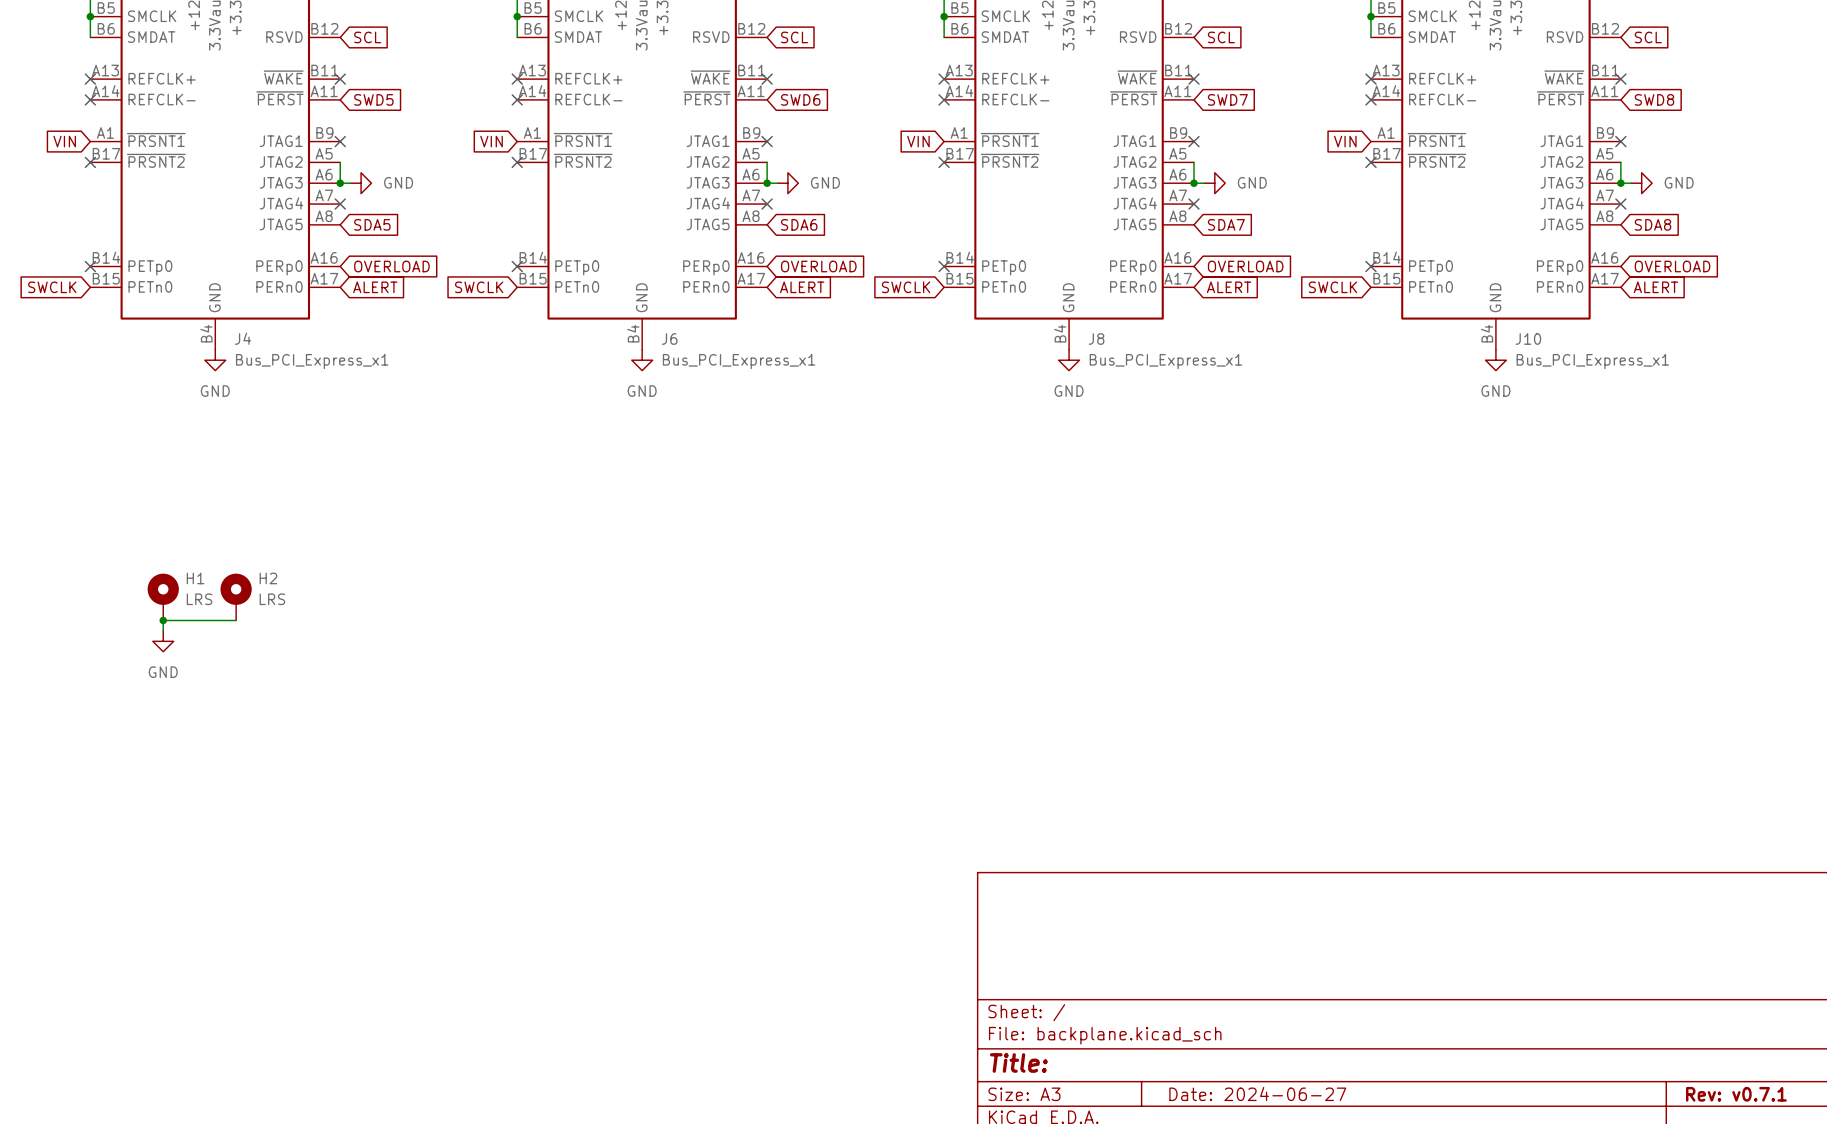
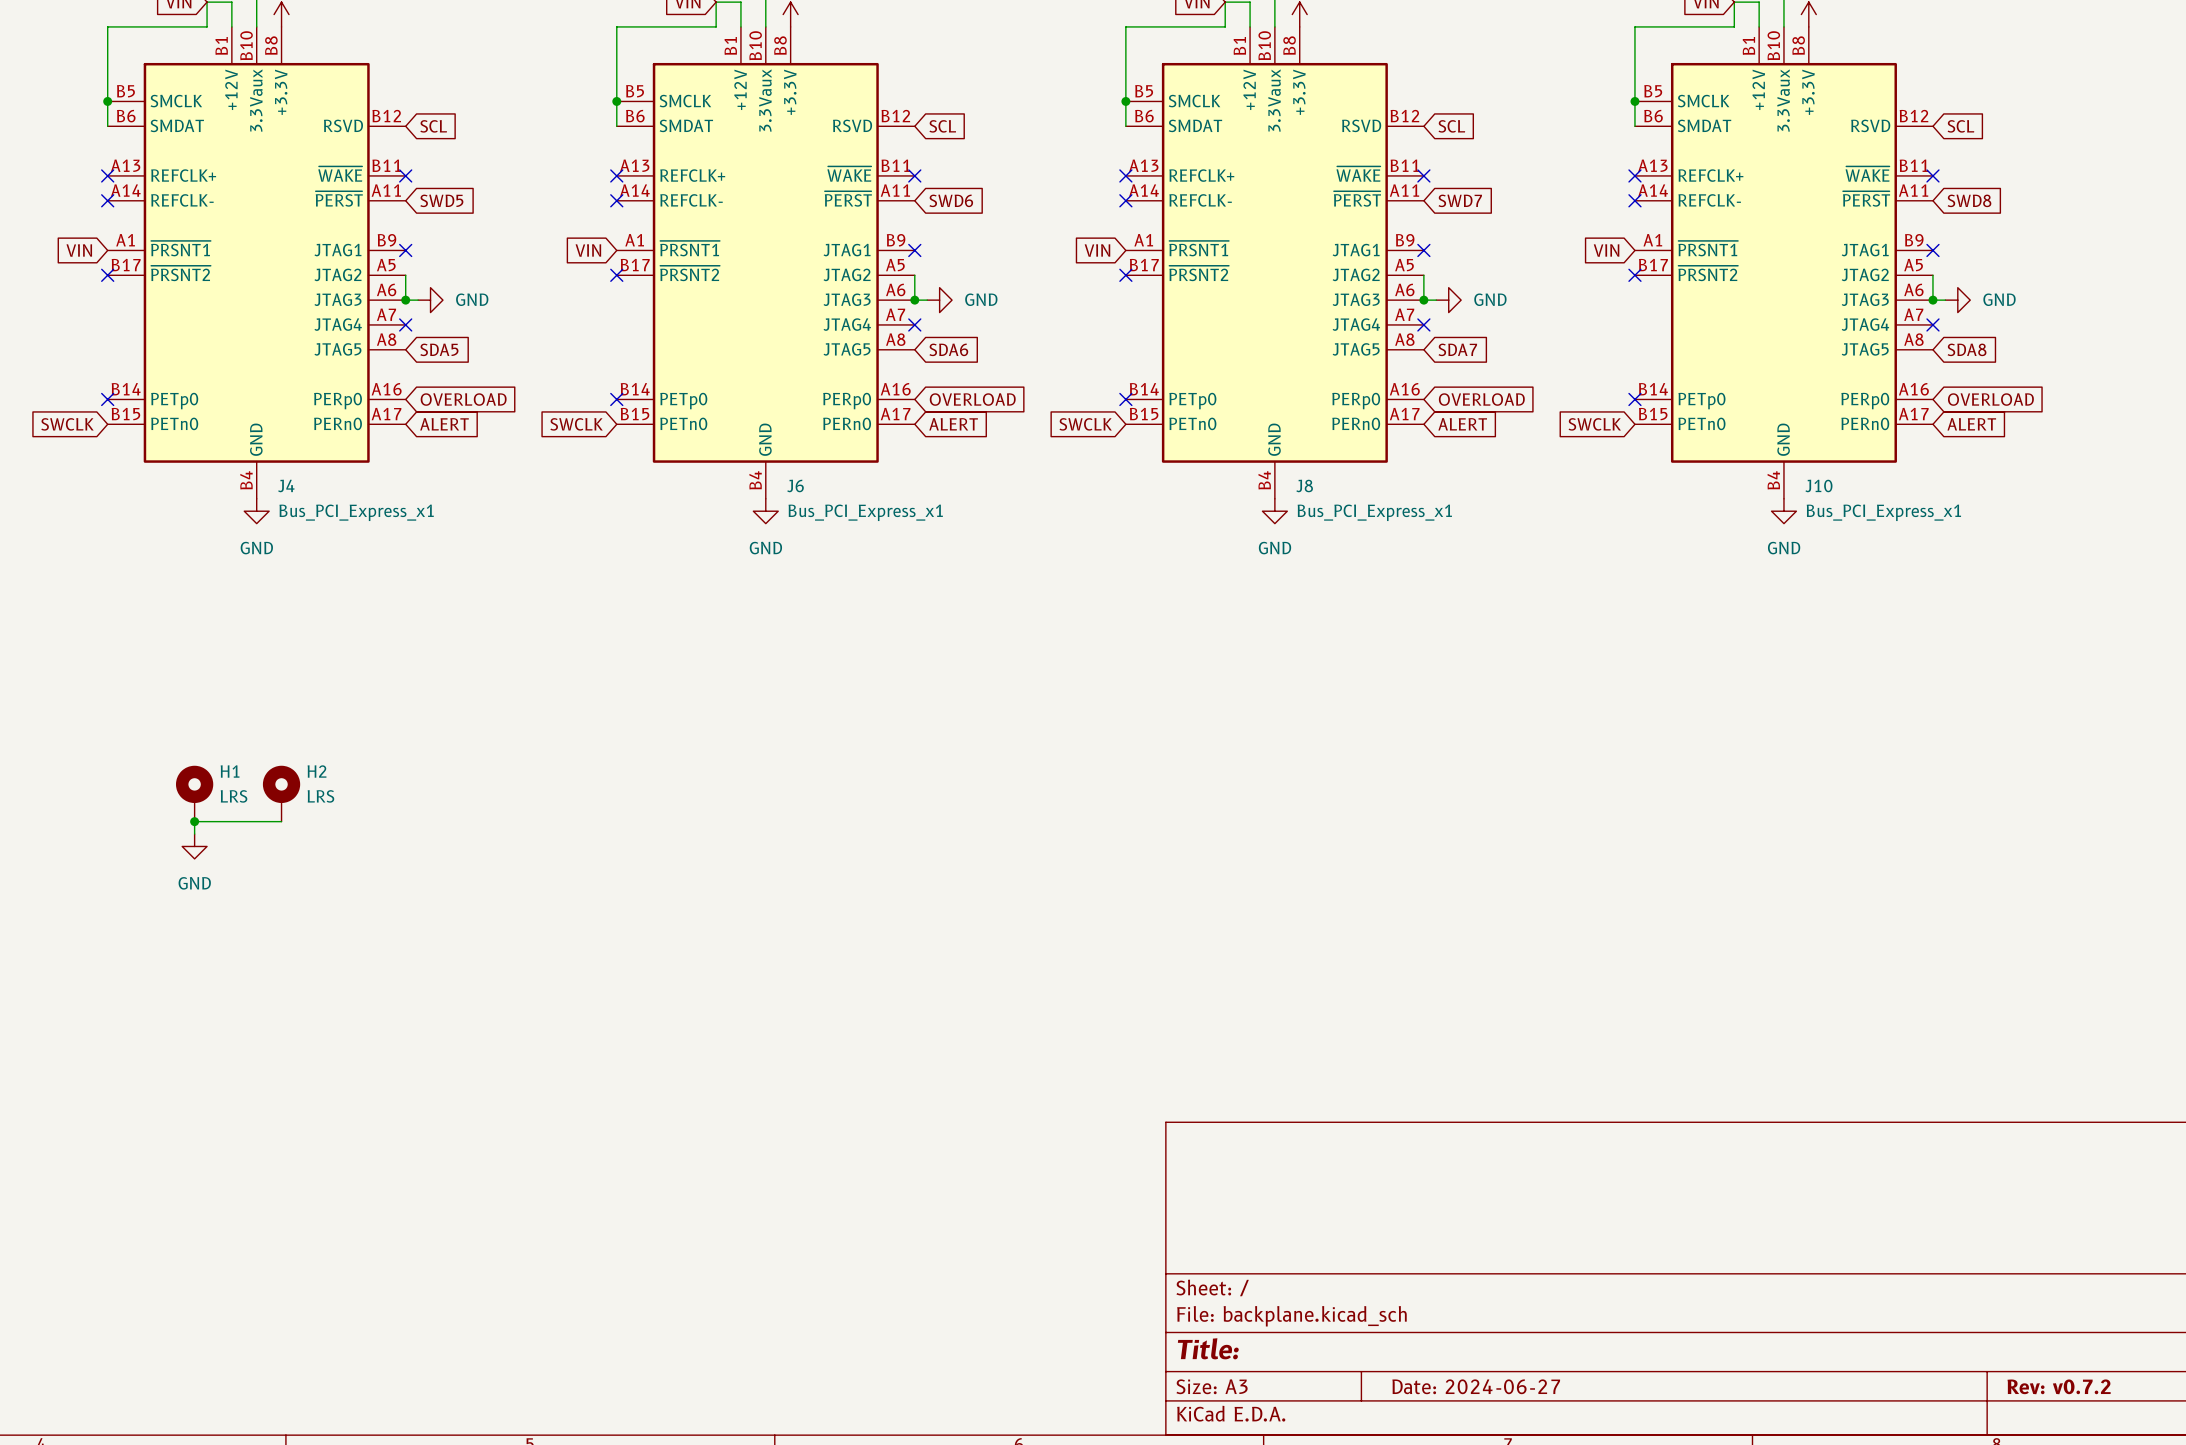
title block: Rev: v0.7.1 (1736, 1094) -> Rev: v0.7.2 (2059, 1386)

